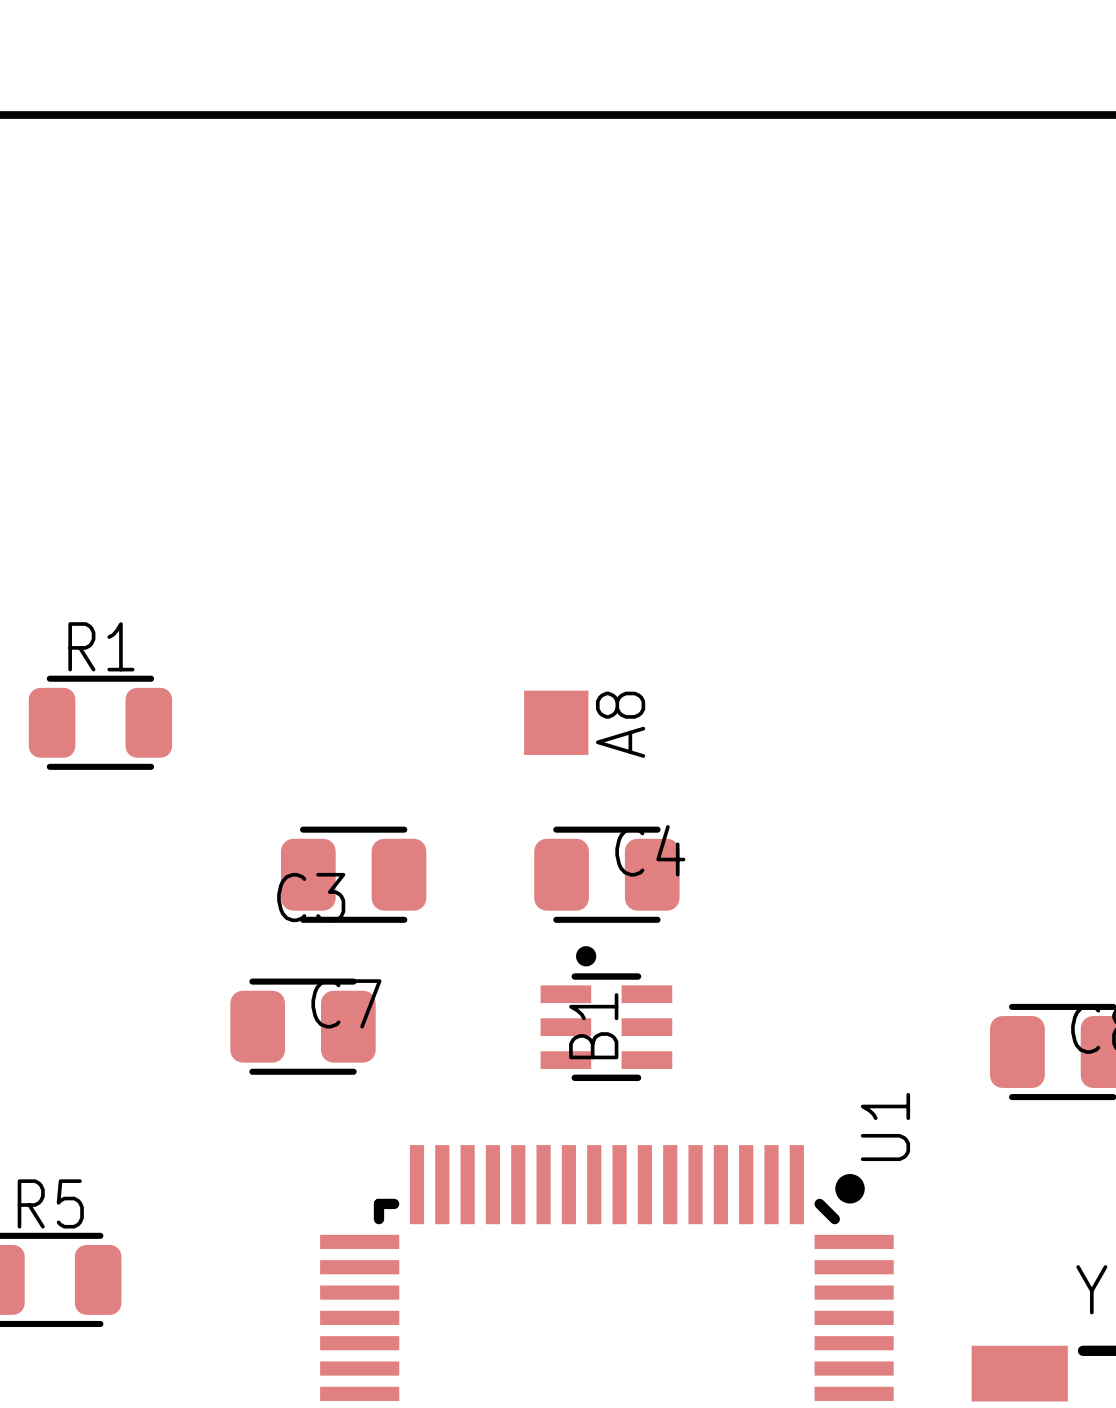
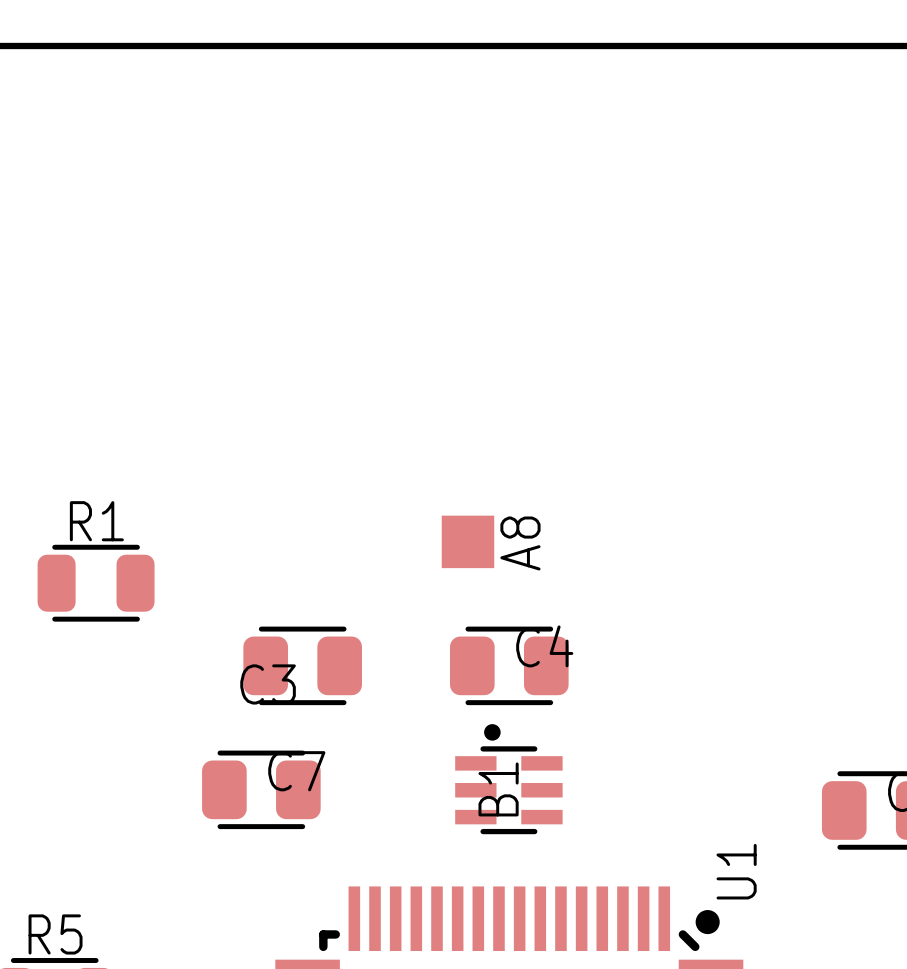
R1 position: (100, 722) -> (96, 583)

